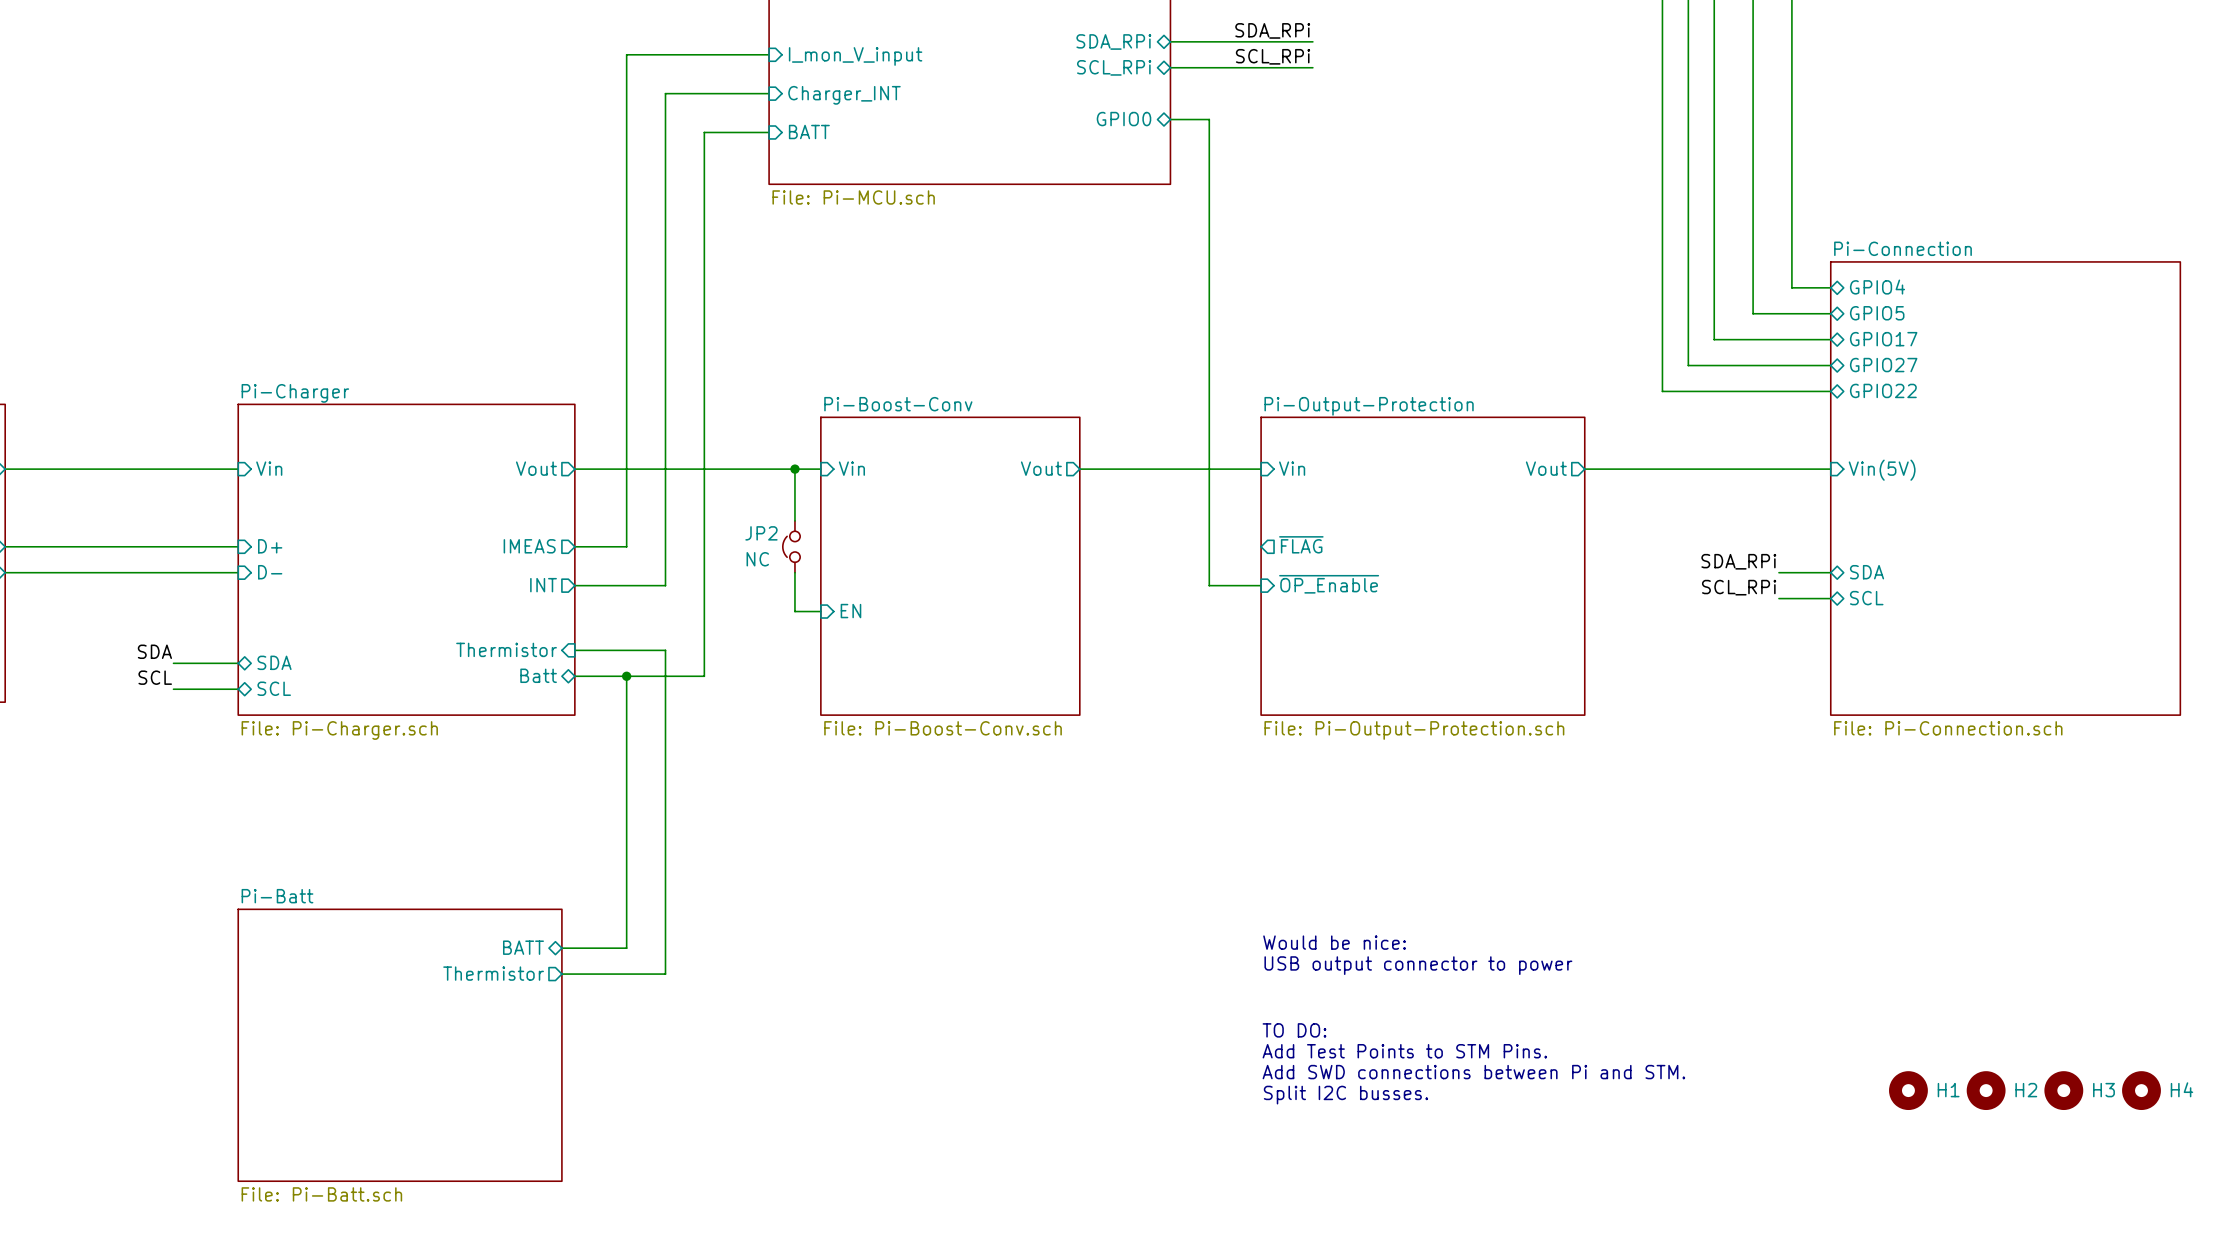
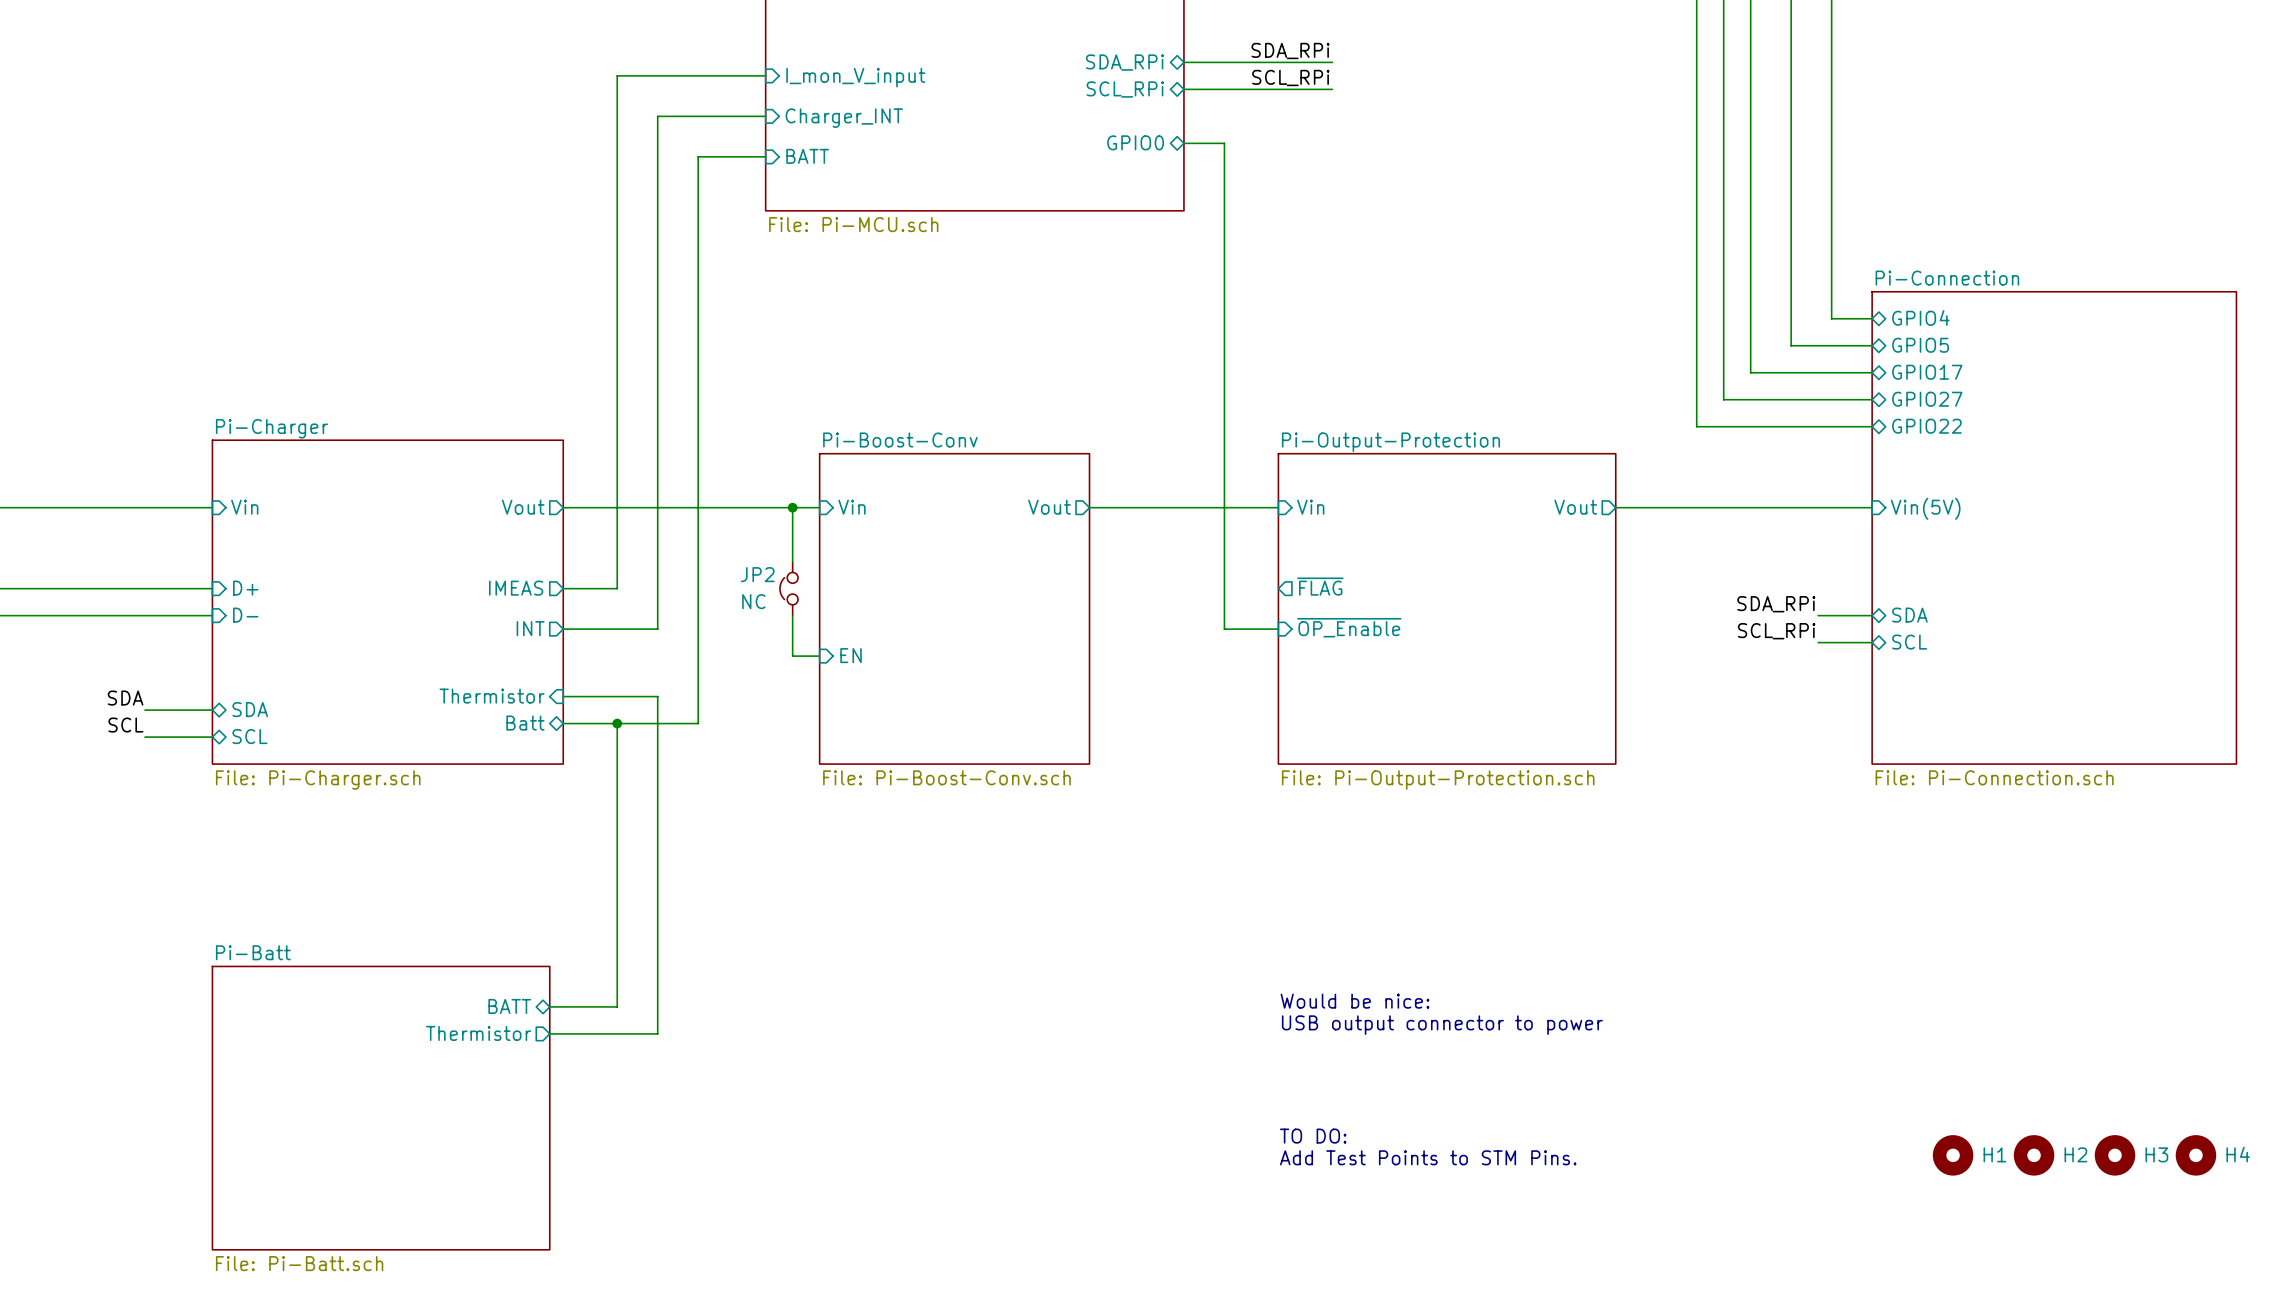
text: TO DO: (1294, 1030) -> none
text: Add Test Points to STM Pins. (1404, 1051) -> none
text: Add SWD connections between Pi and STM. (1473, 1072) -> TO DO: (1313, 1136)
text: Split I2C busses. (1345, 1095) -> Add Test Points to STM Pins. (1428, 1157)

